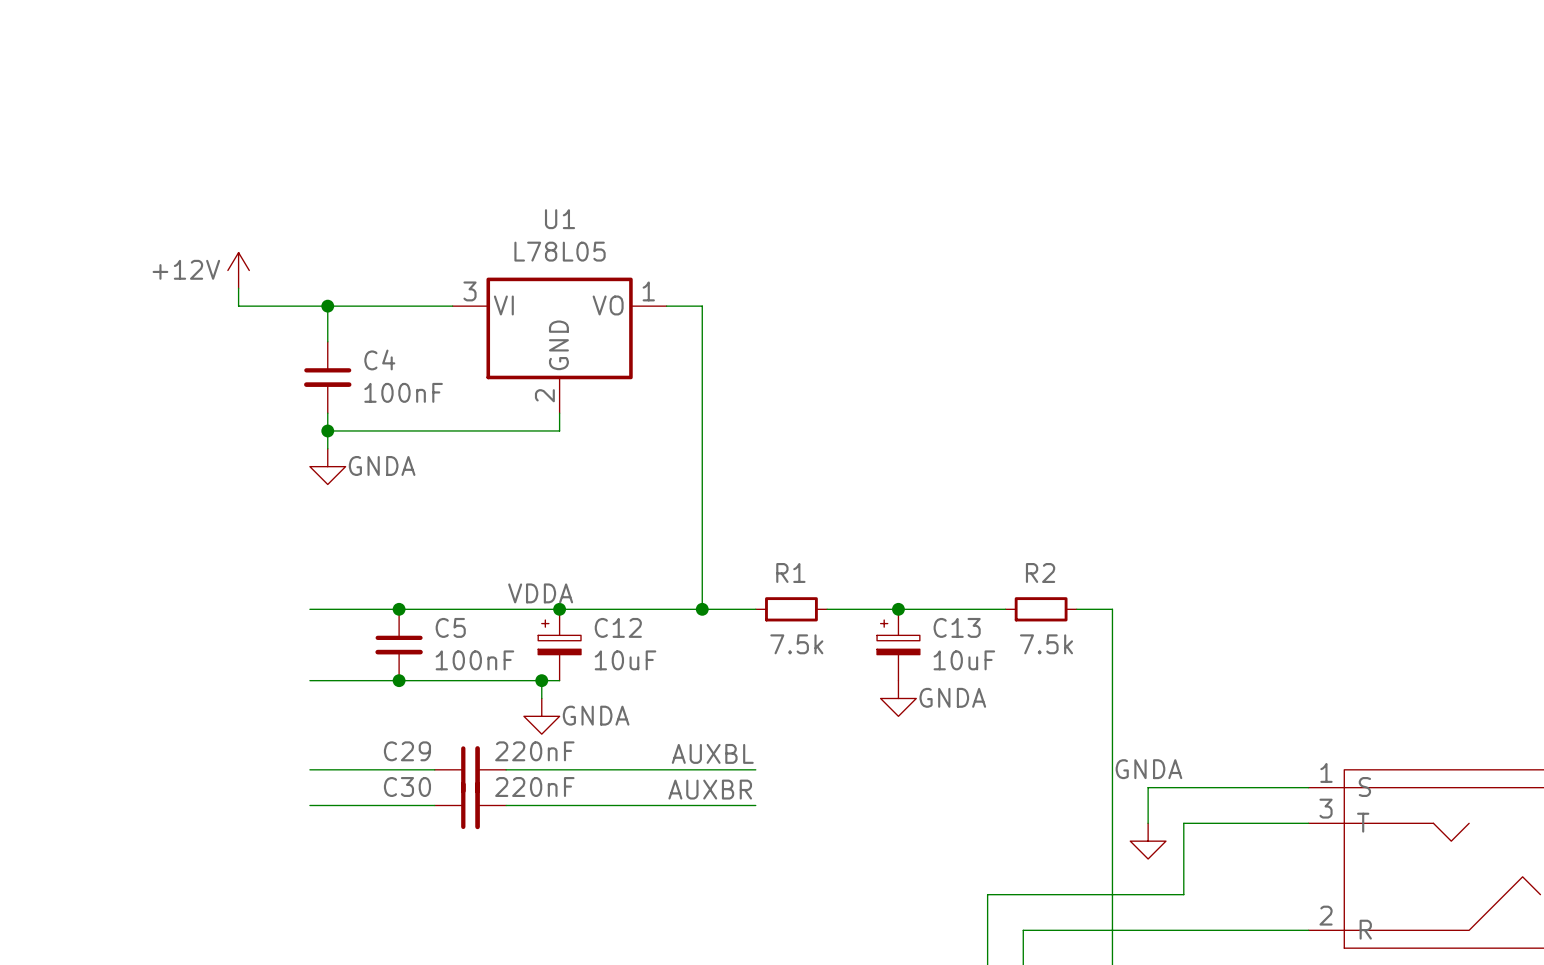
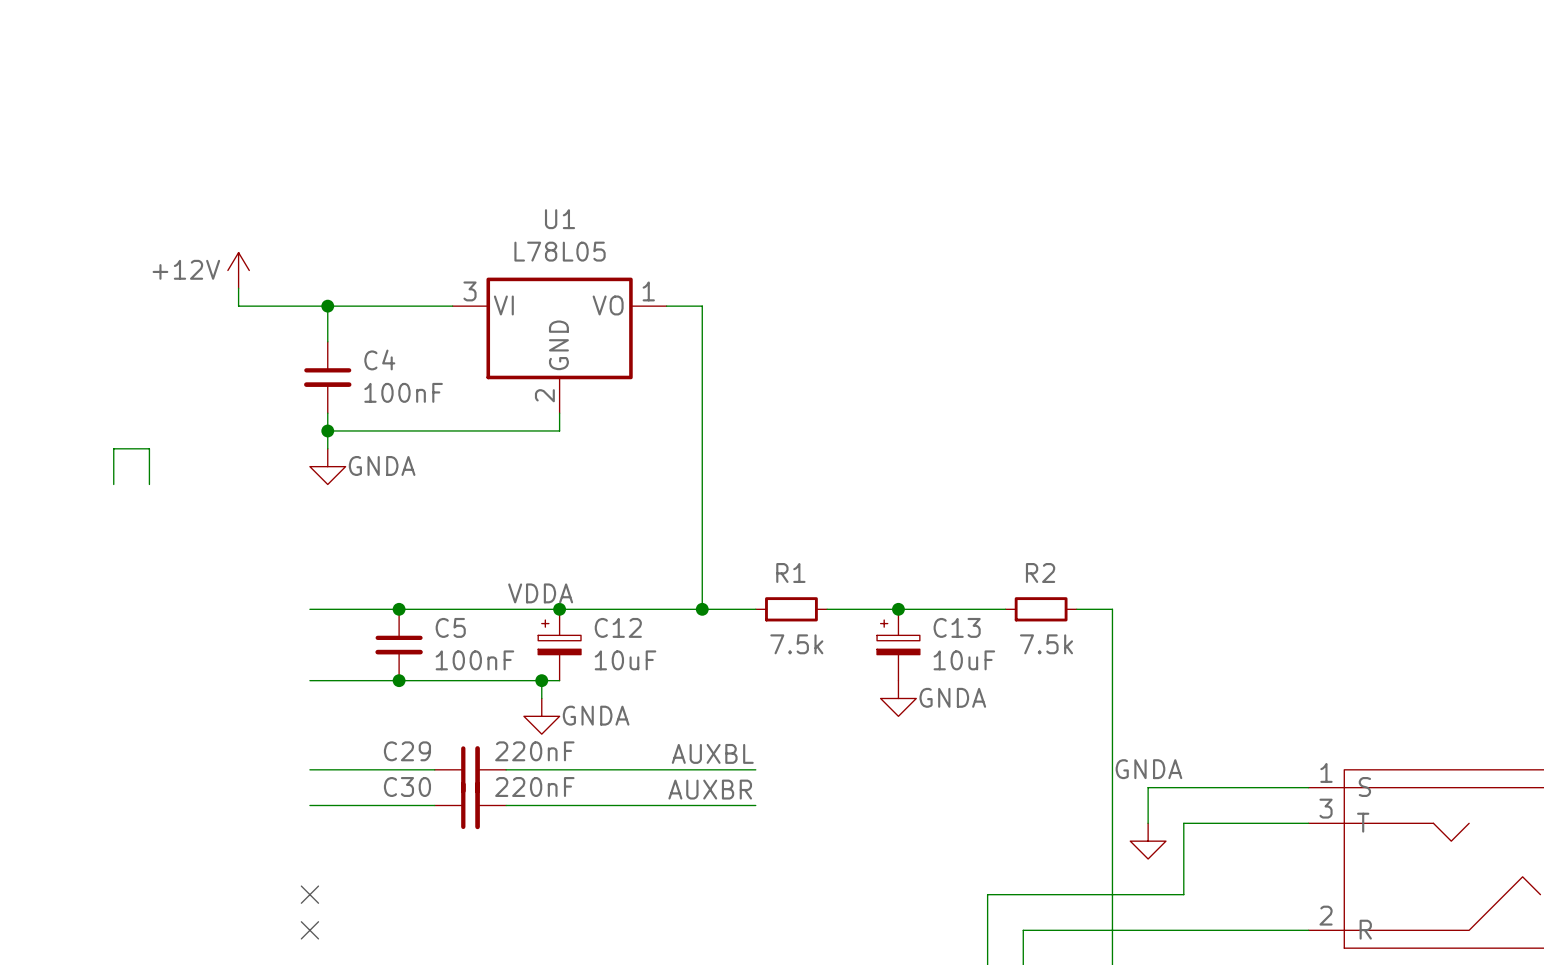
wire: none -> (113, 484) (113, 448) (149, 448) (149, 484)
no-connect mark: none -> (309, 894)
no-connect mark: none -> (309, 930)

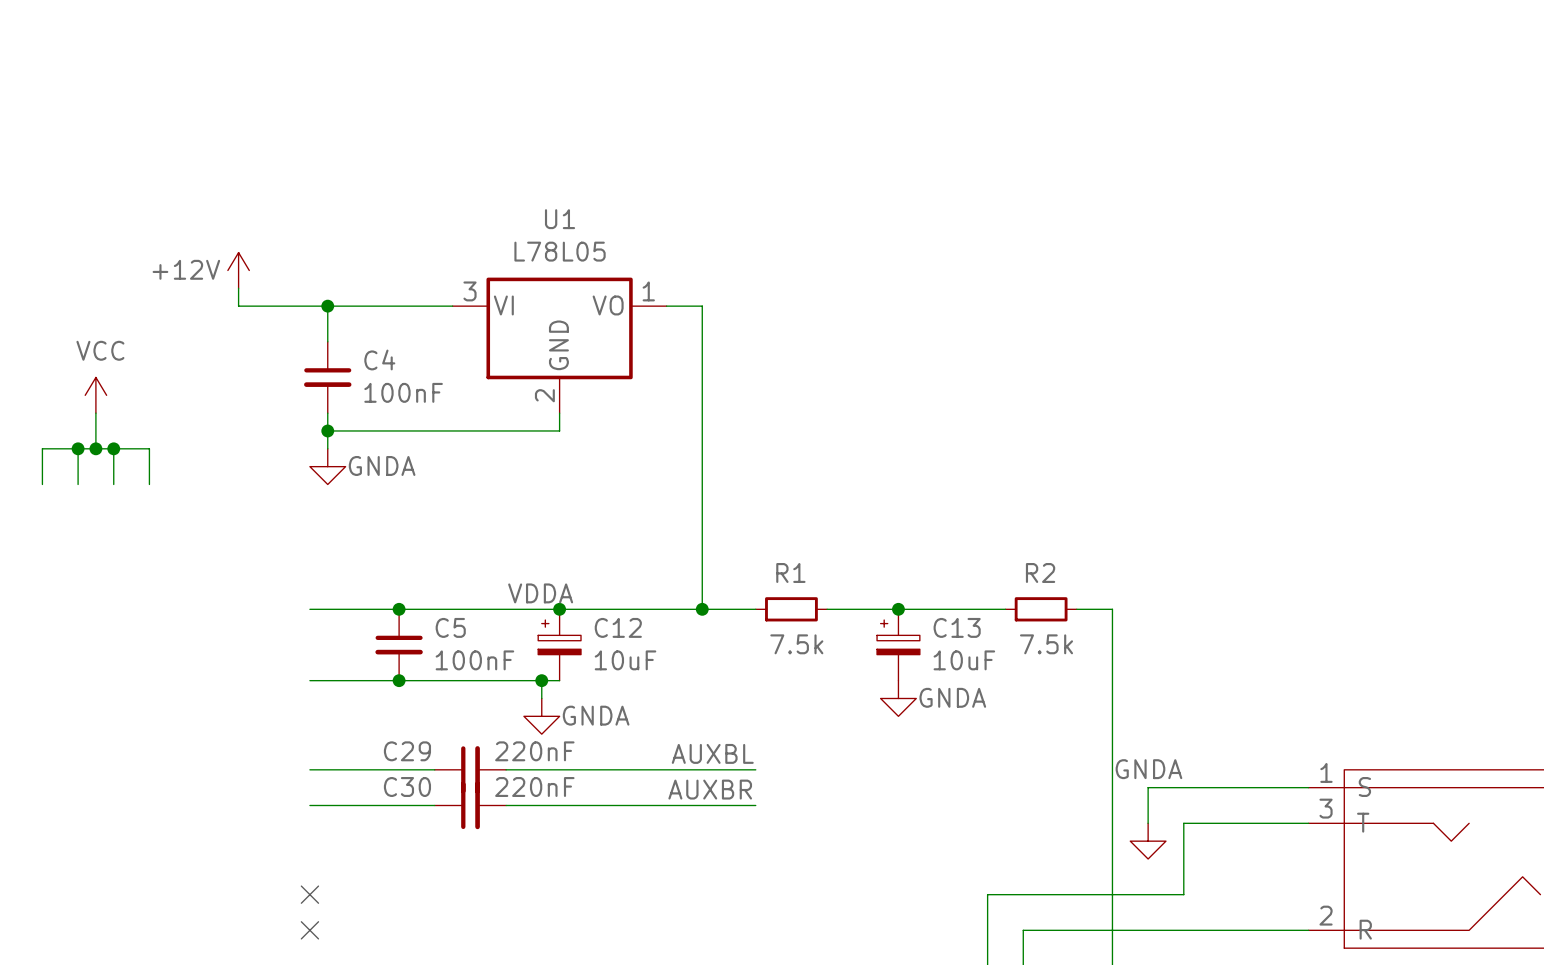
power symbol: none -> VCC (95, 395)
wire: none -> (95, 413) (95, 448)
wire: none -> (78, 448) (78, 484)
junction: none -> (78, 448)
junction: none -> (95, 448)
wire: none -> (113, 448) (42, 448) (42, 484)
junction: none -> (113, 448)

